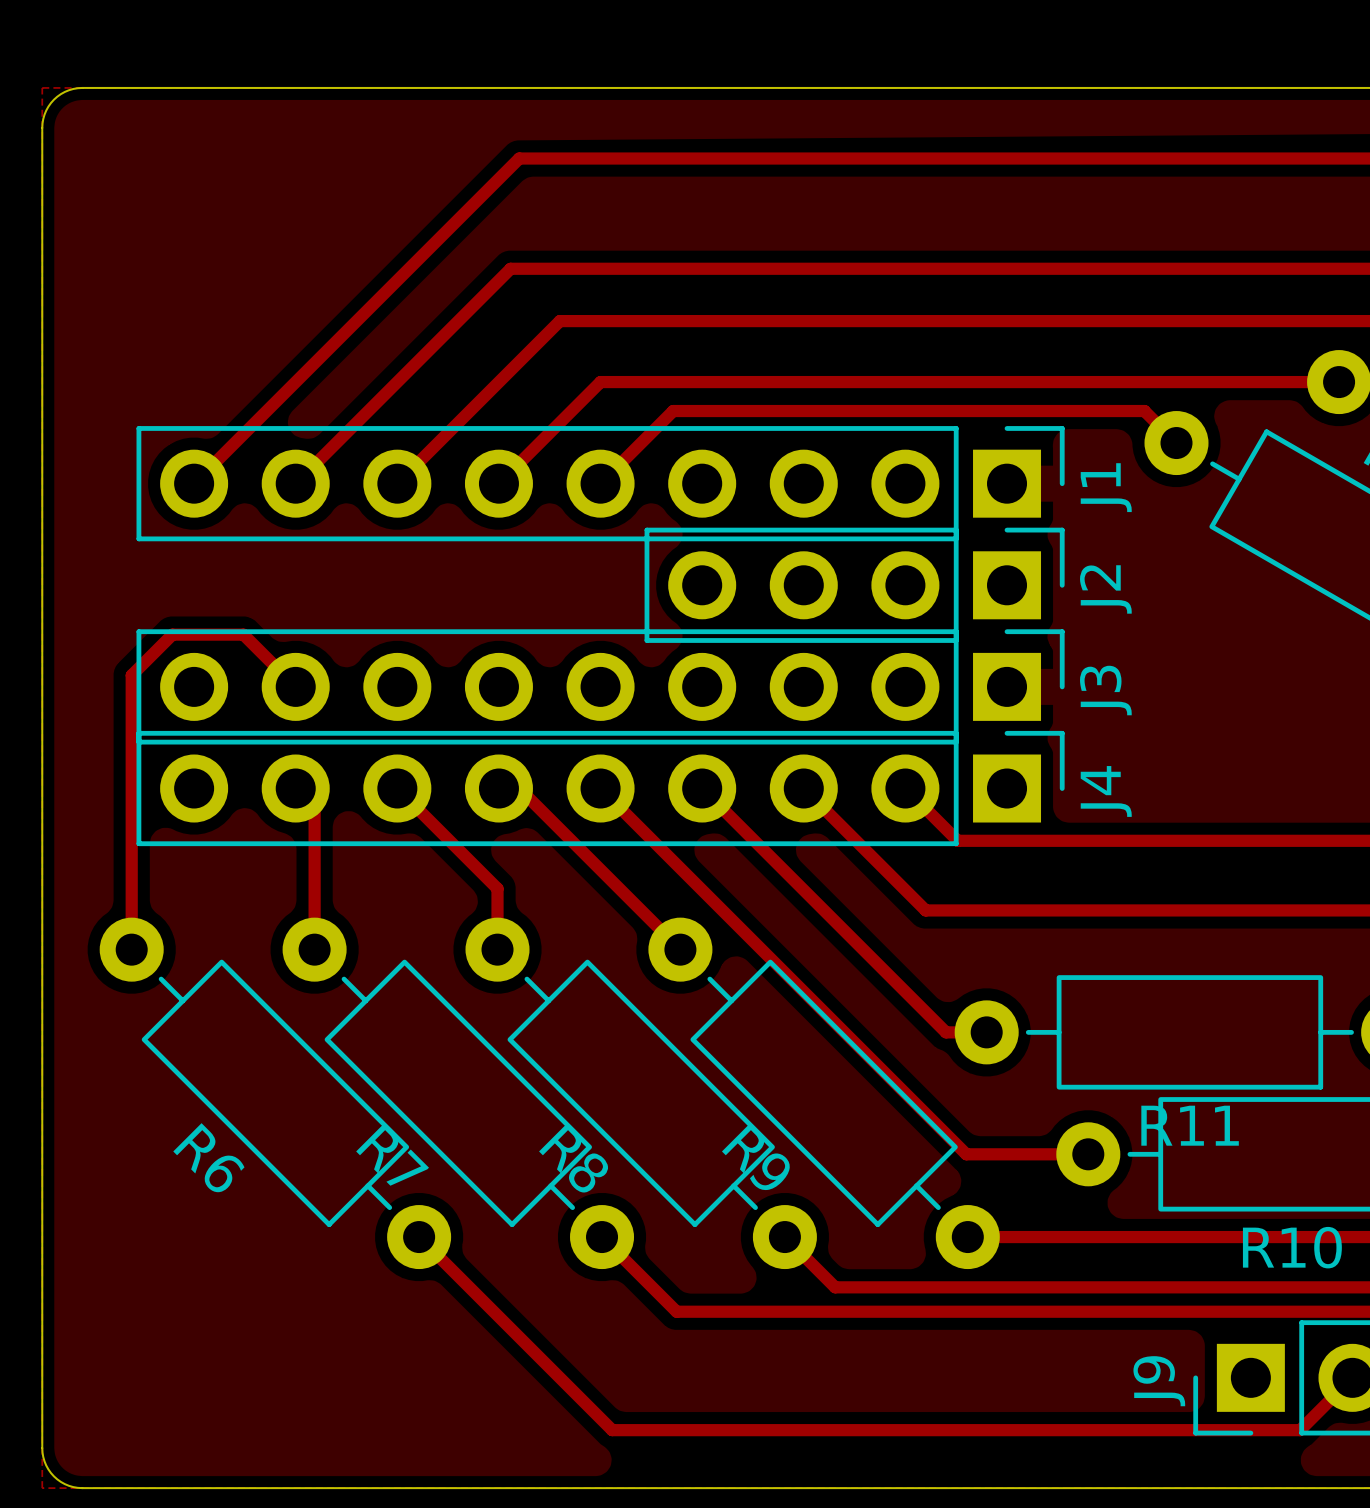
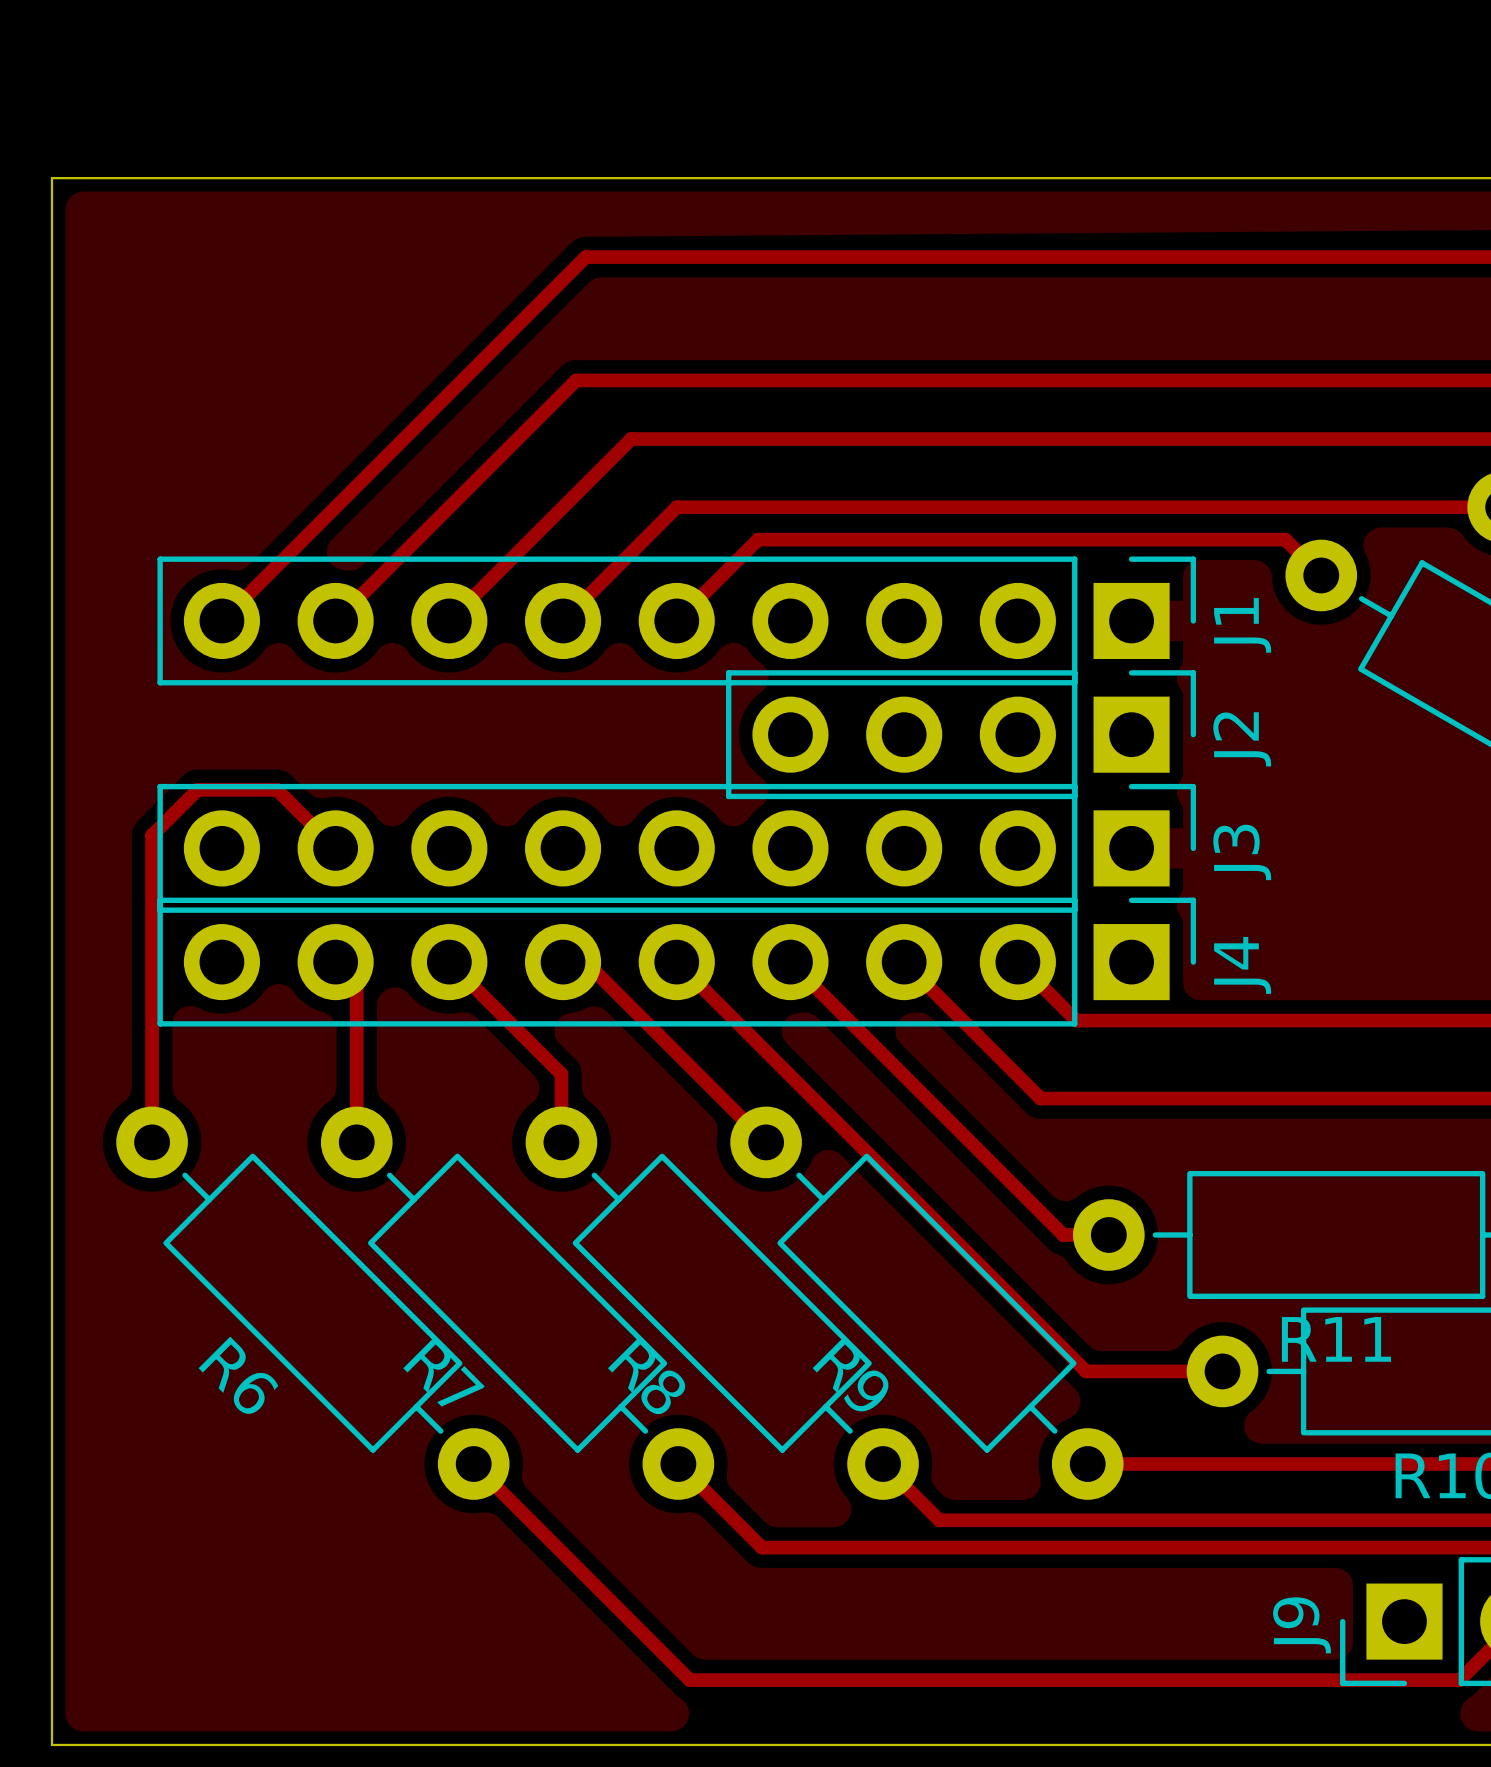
board edge: (82, 87) (69, 90) (53, 99) (44, 114) (42, 127) -> (96, 178) (51, 178) (51, 222)
board edge: (42, 1448) (46, 1465) (53, 1476) (64, 1484) (82, 1488) -> (51, 1700) (51, 1744) (96, 1744)

